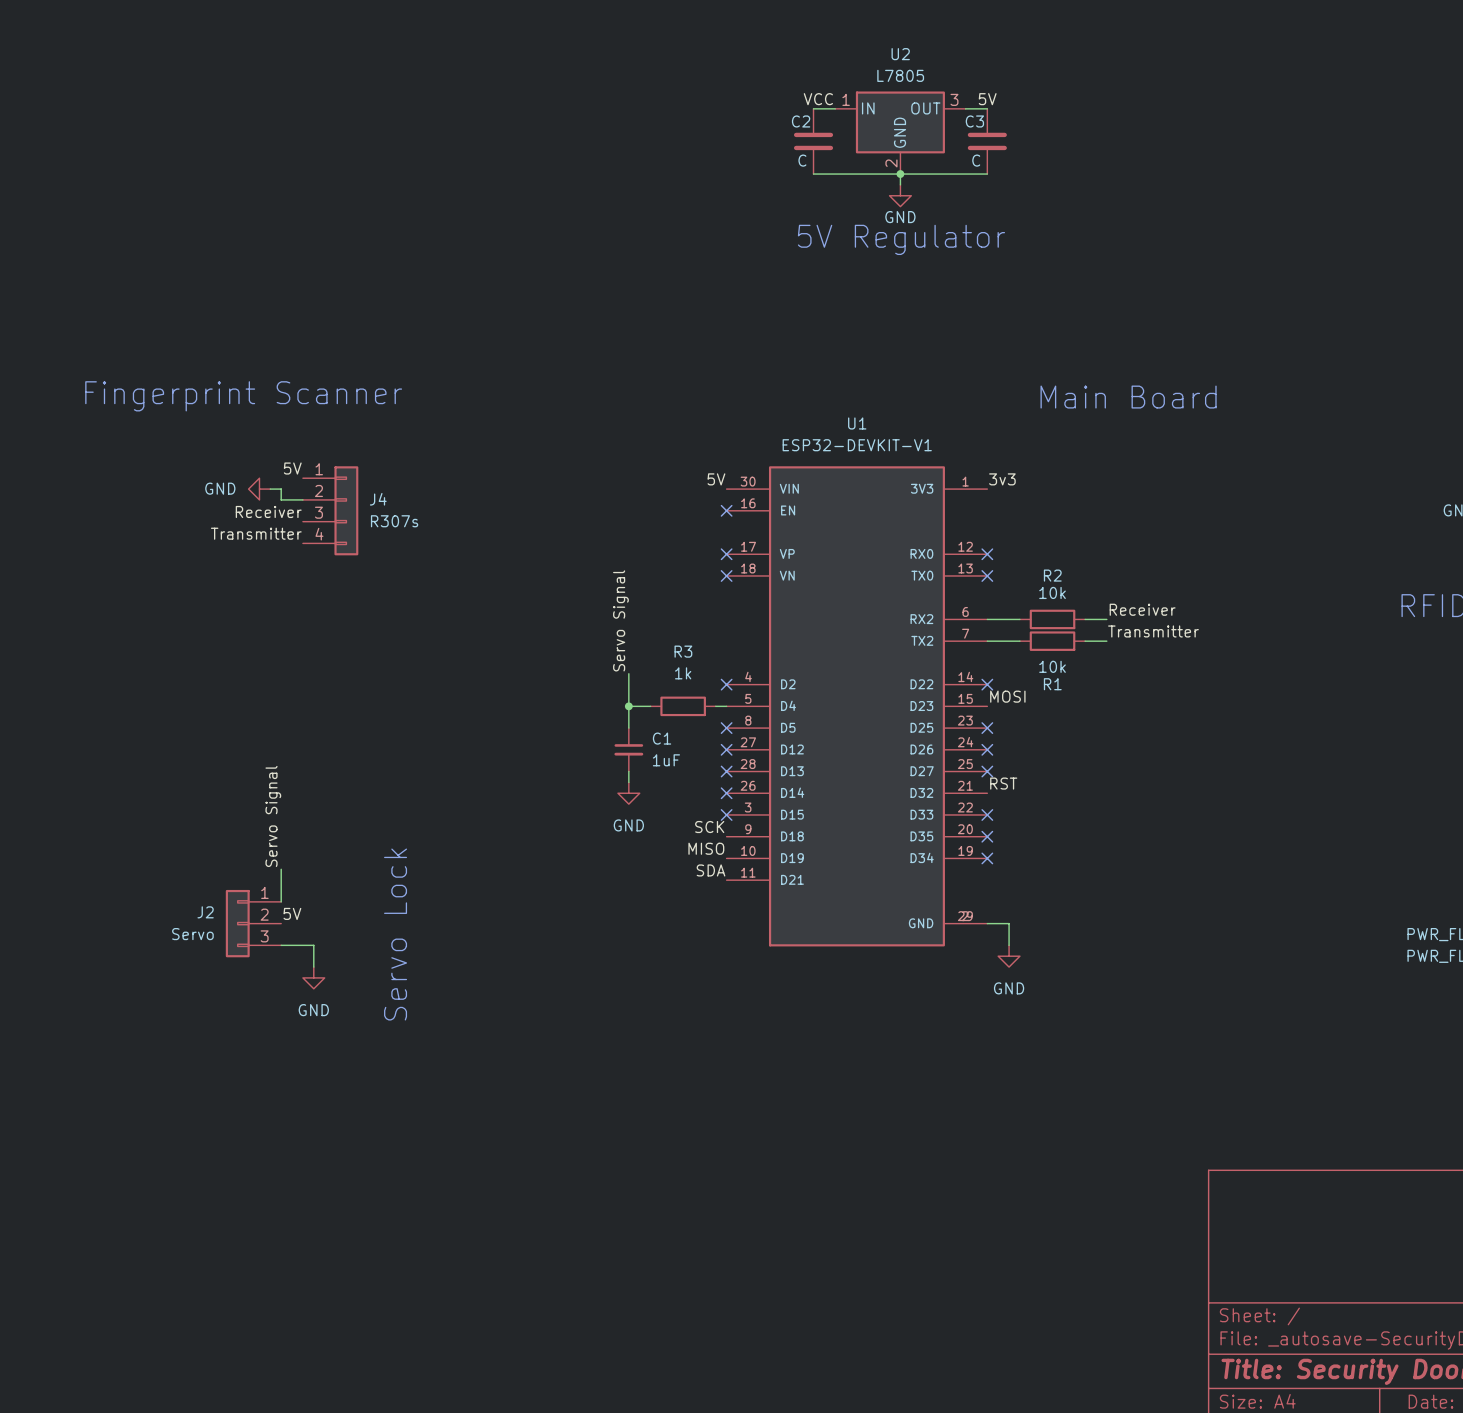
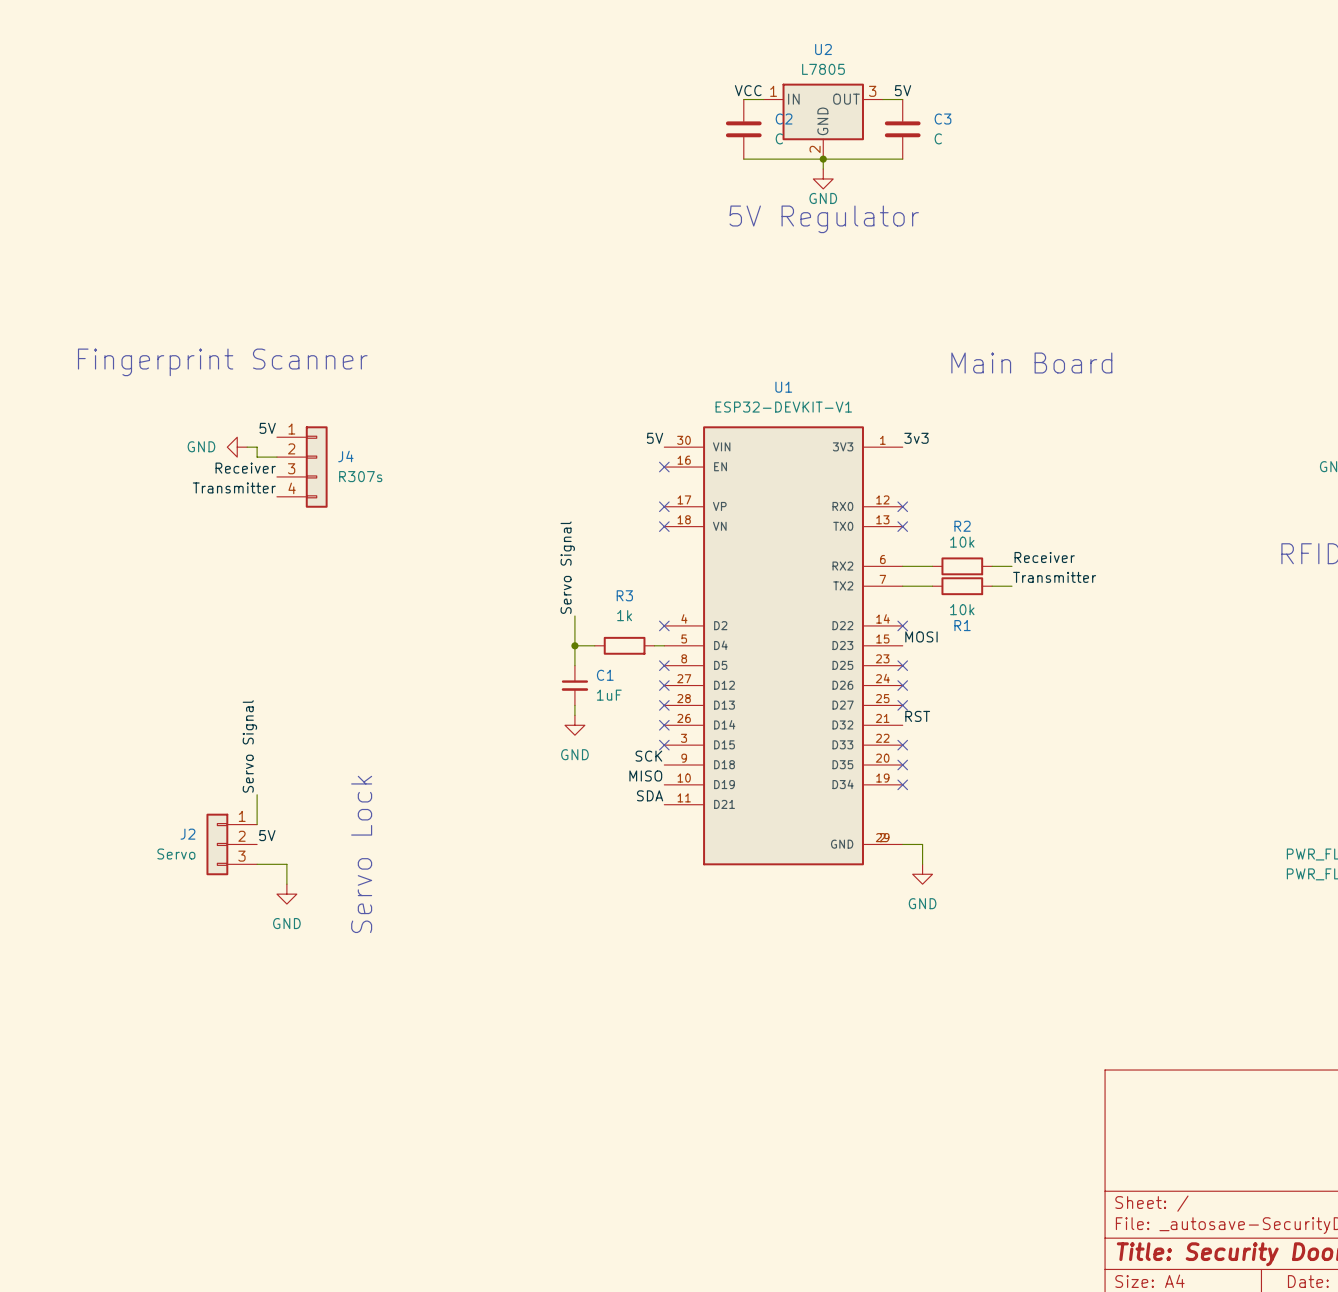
C2 name position: C2 (801, 121) -> C2 (784, 119)
C3 name position: C3 (974, 121) -> C3 (942, 119)
C2 value position: C (802, 160) -> C (779, 138)
C3 value position: C (976, 160) -> C (938, 138)

